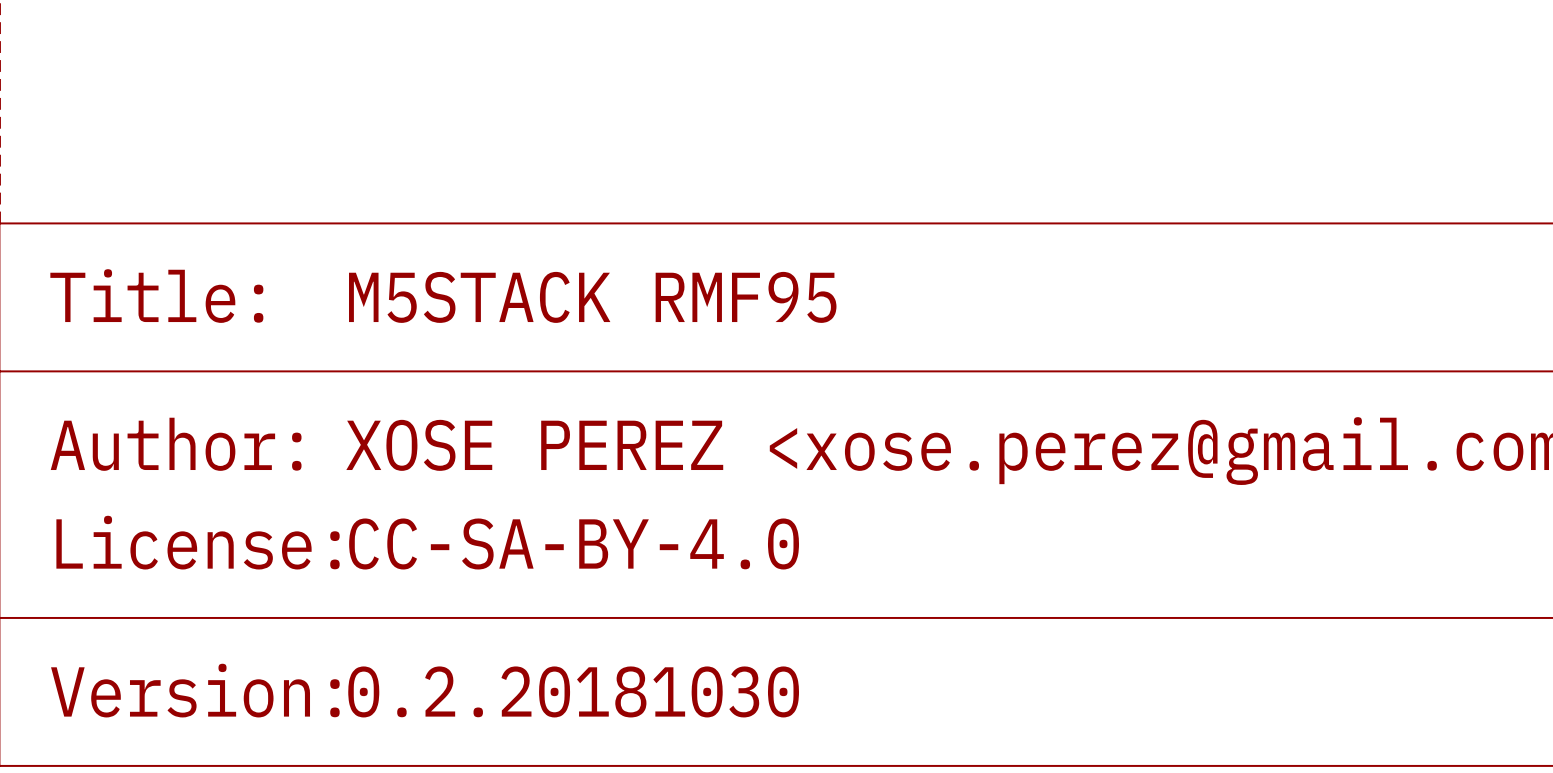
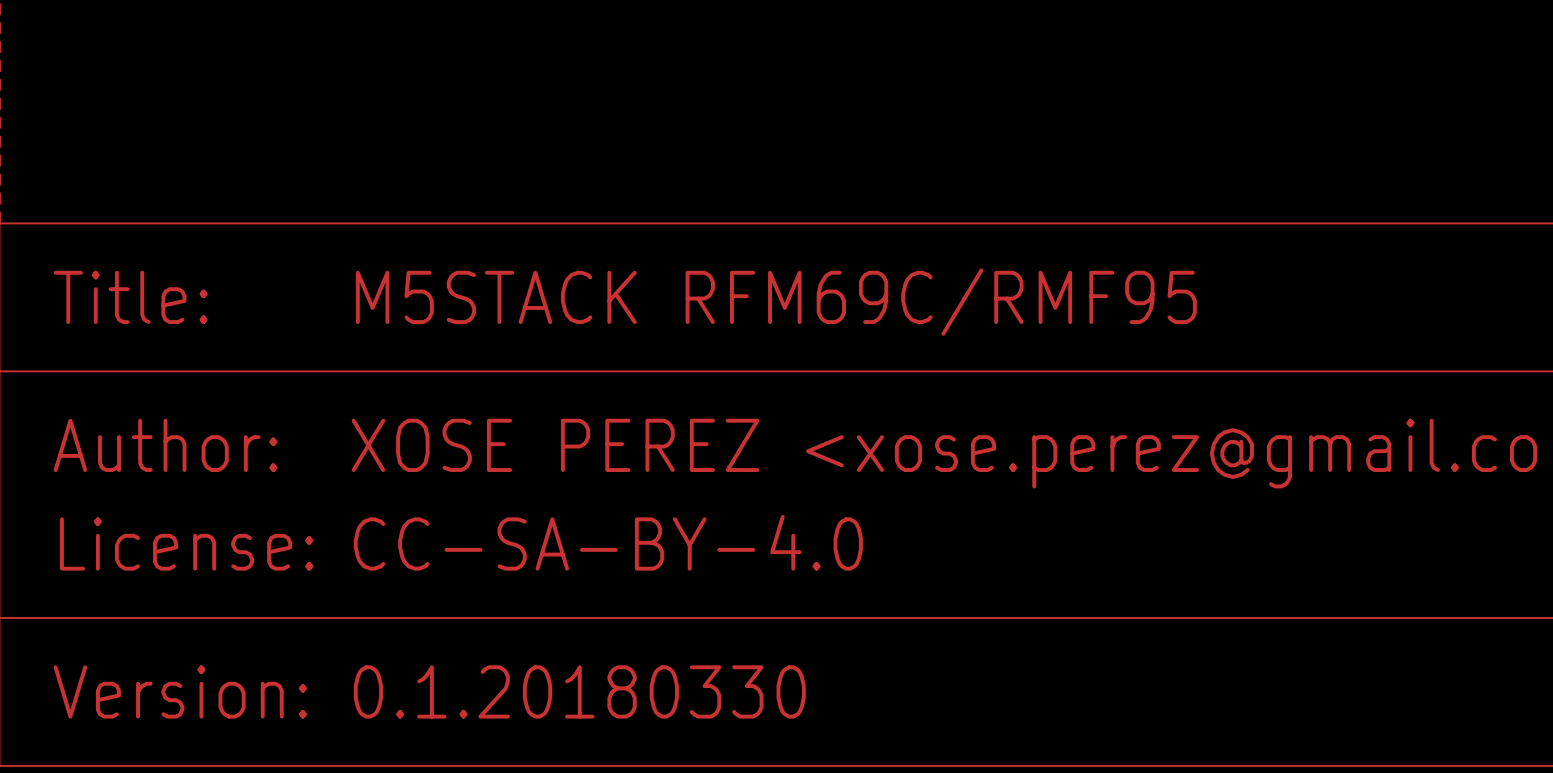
part text: M5STACK RMF95 (592, 297) -> M5STACK RFM69C/RMF95 (776, 302)
part text: 0.2.20181030 (573, 691) -> 0.1.20180330 (579, 691)

